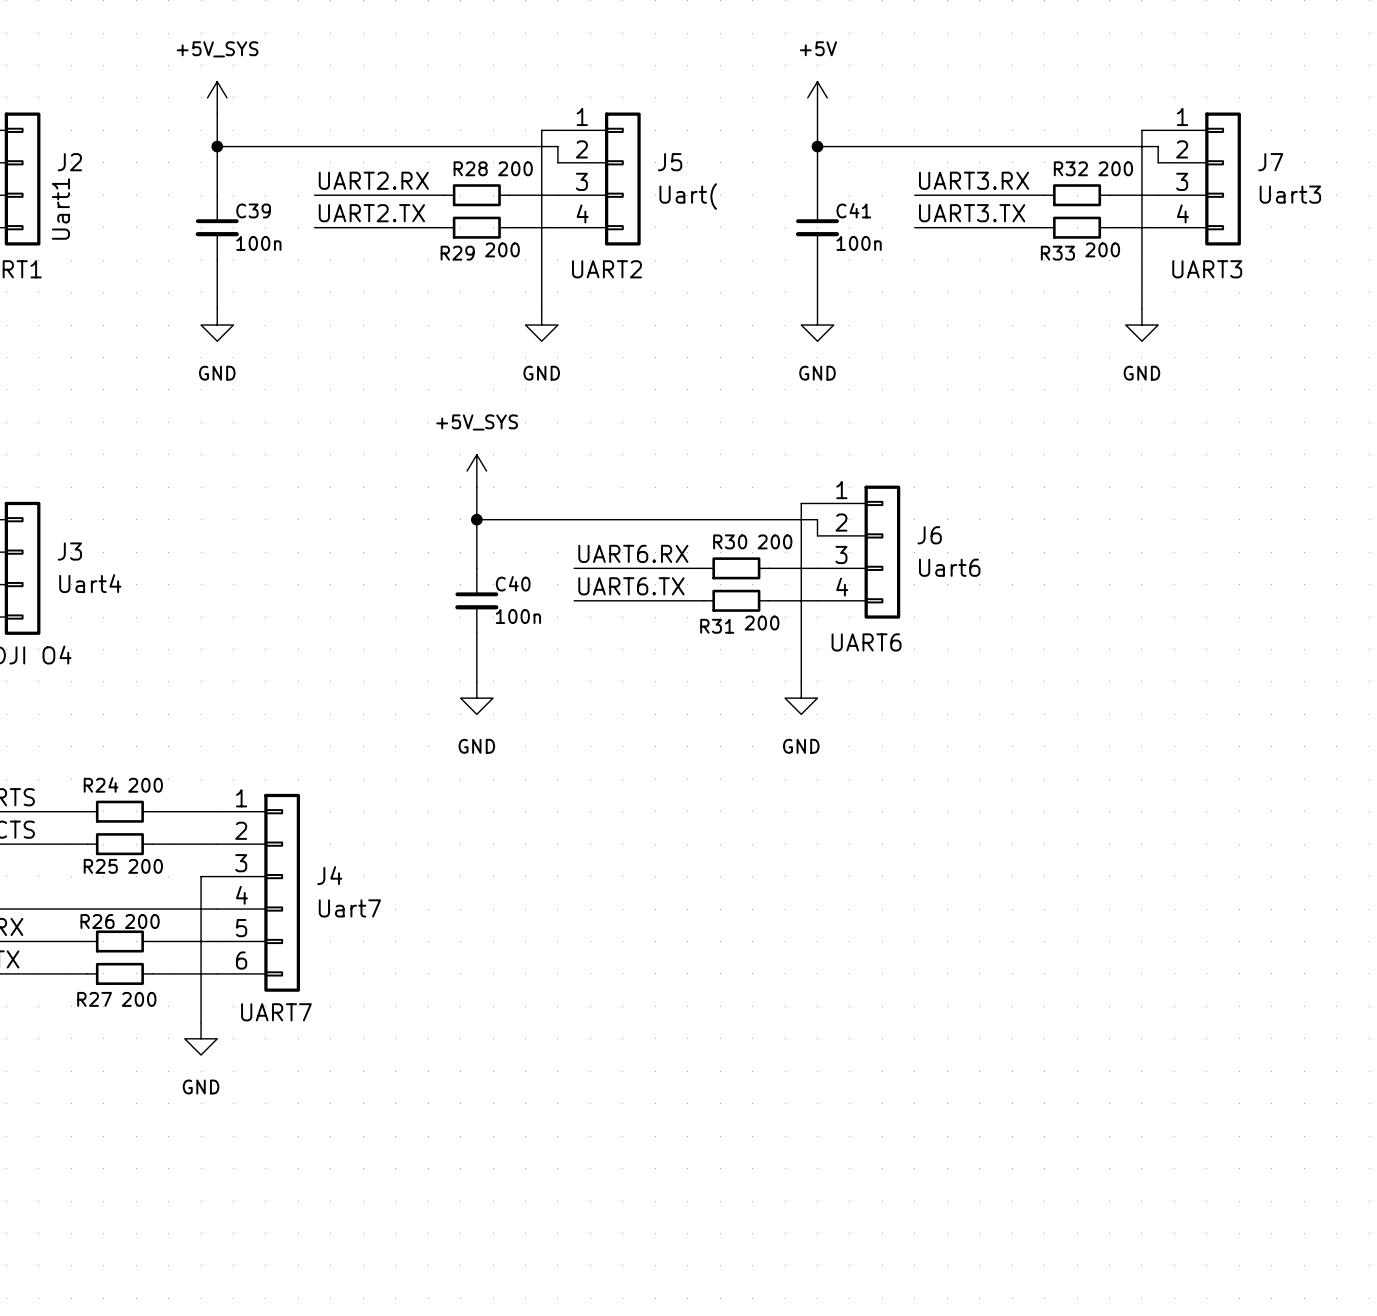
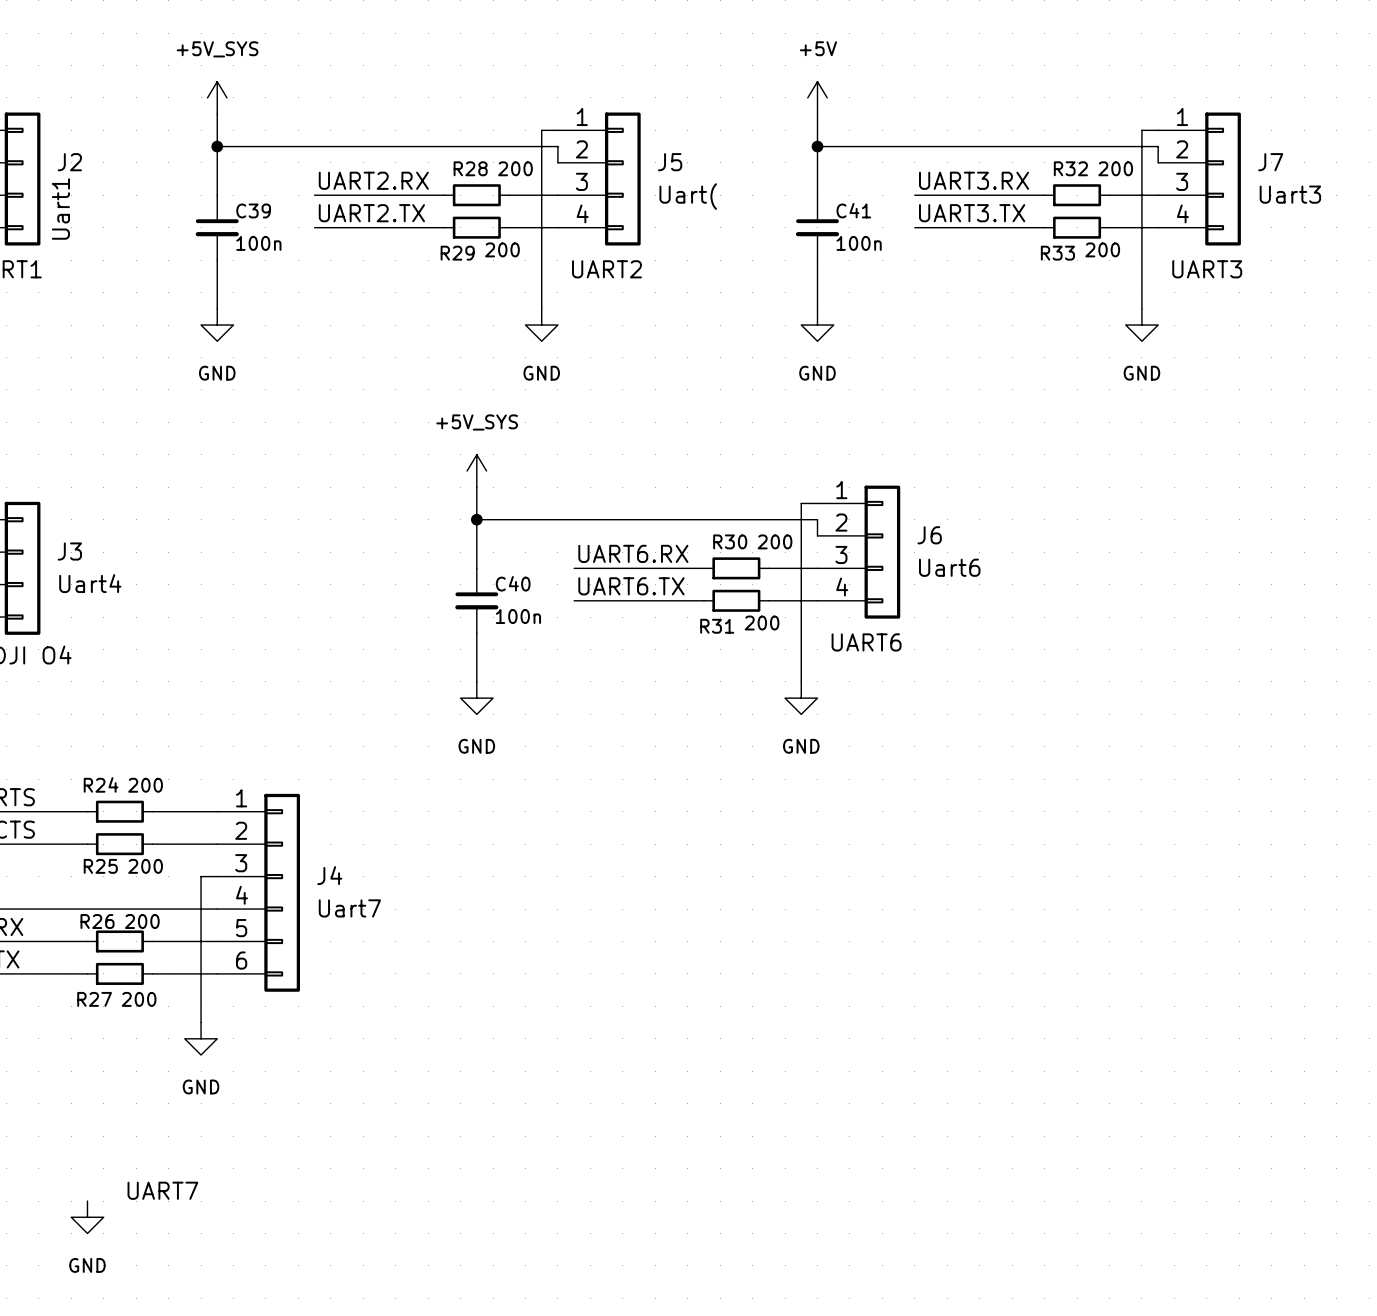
text position: UART7 (276, 1012) -> UART7 (162, 1190)
power symbol: none -> GND (87, 1217)

